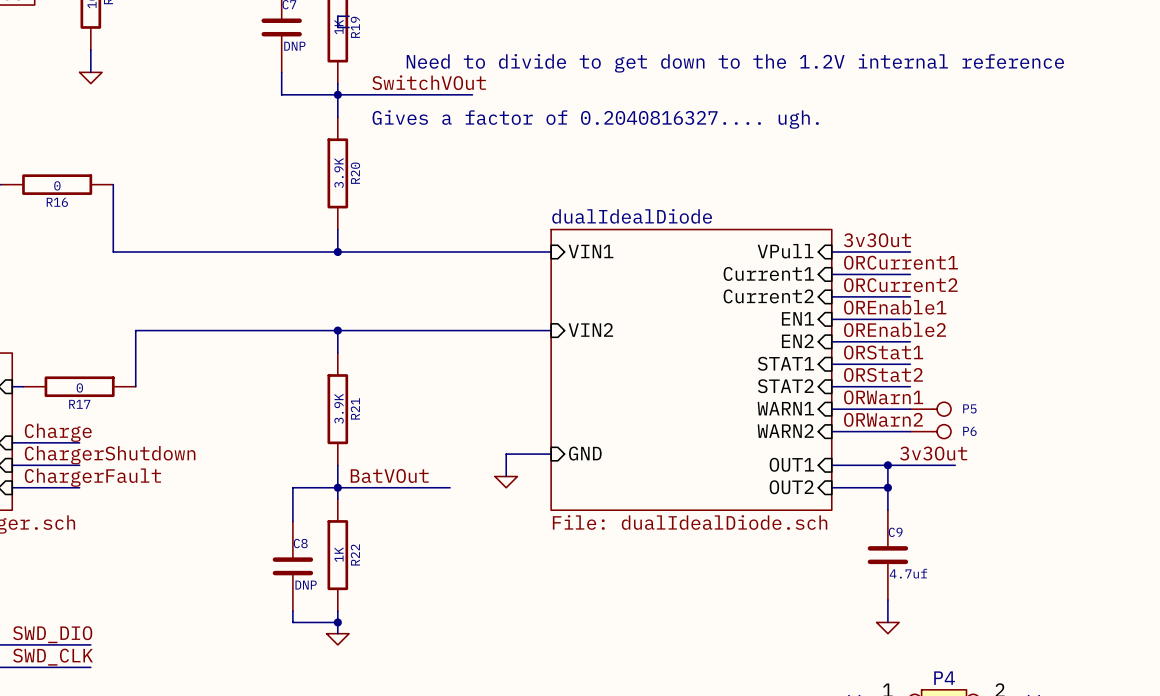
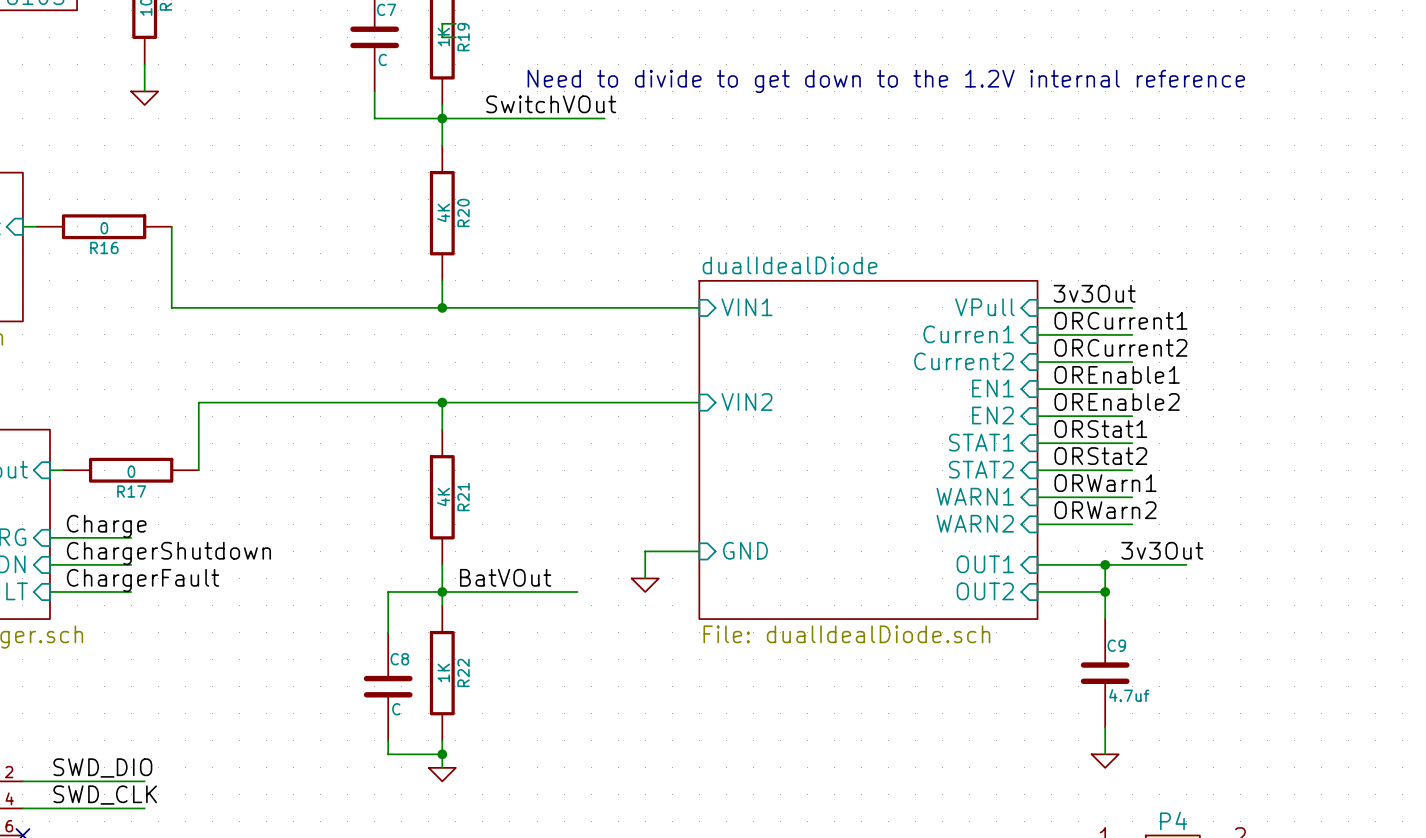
C7 value: DNP (294, 46) -> C (382, 59)
text: Gives a factor of 0.2040816327.... ugh. (595, 119) -> none
R20 value: 3.9K (339, 173) -> 4K (443, 212)
sheet pin: Current1 (768, 273) -> Curren1 (968, 334)
R21 value: 3.9K (339, 408) -> 4K (443, 497)
P5: (930, 409) -> none
P6: (930, 431) -> none
C8 value: DNP (306, 585) -> C (396, 709)

